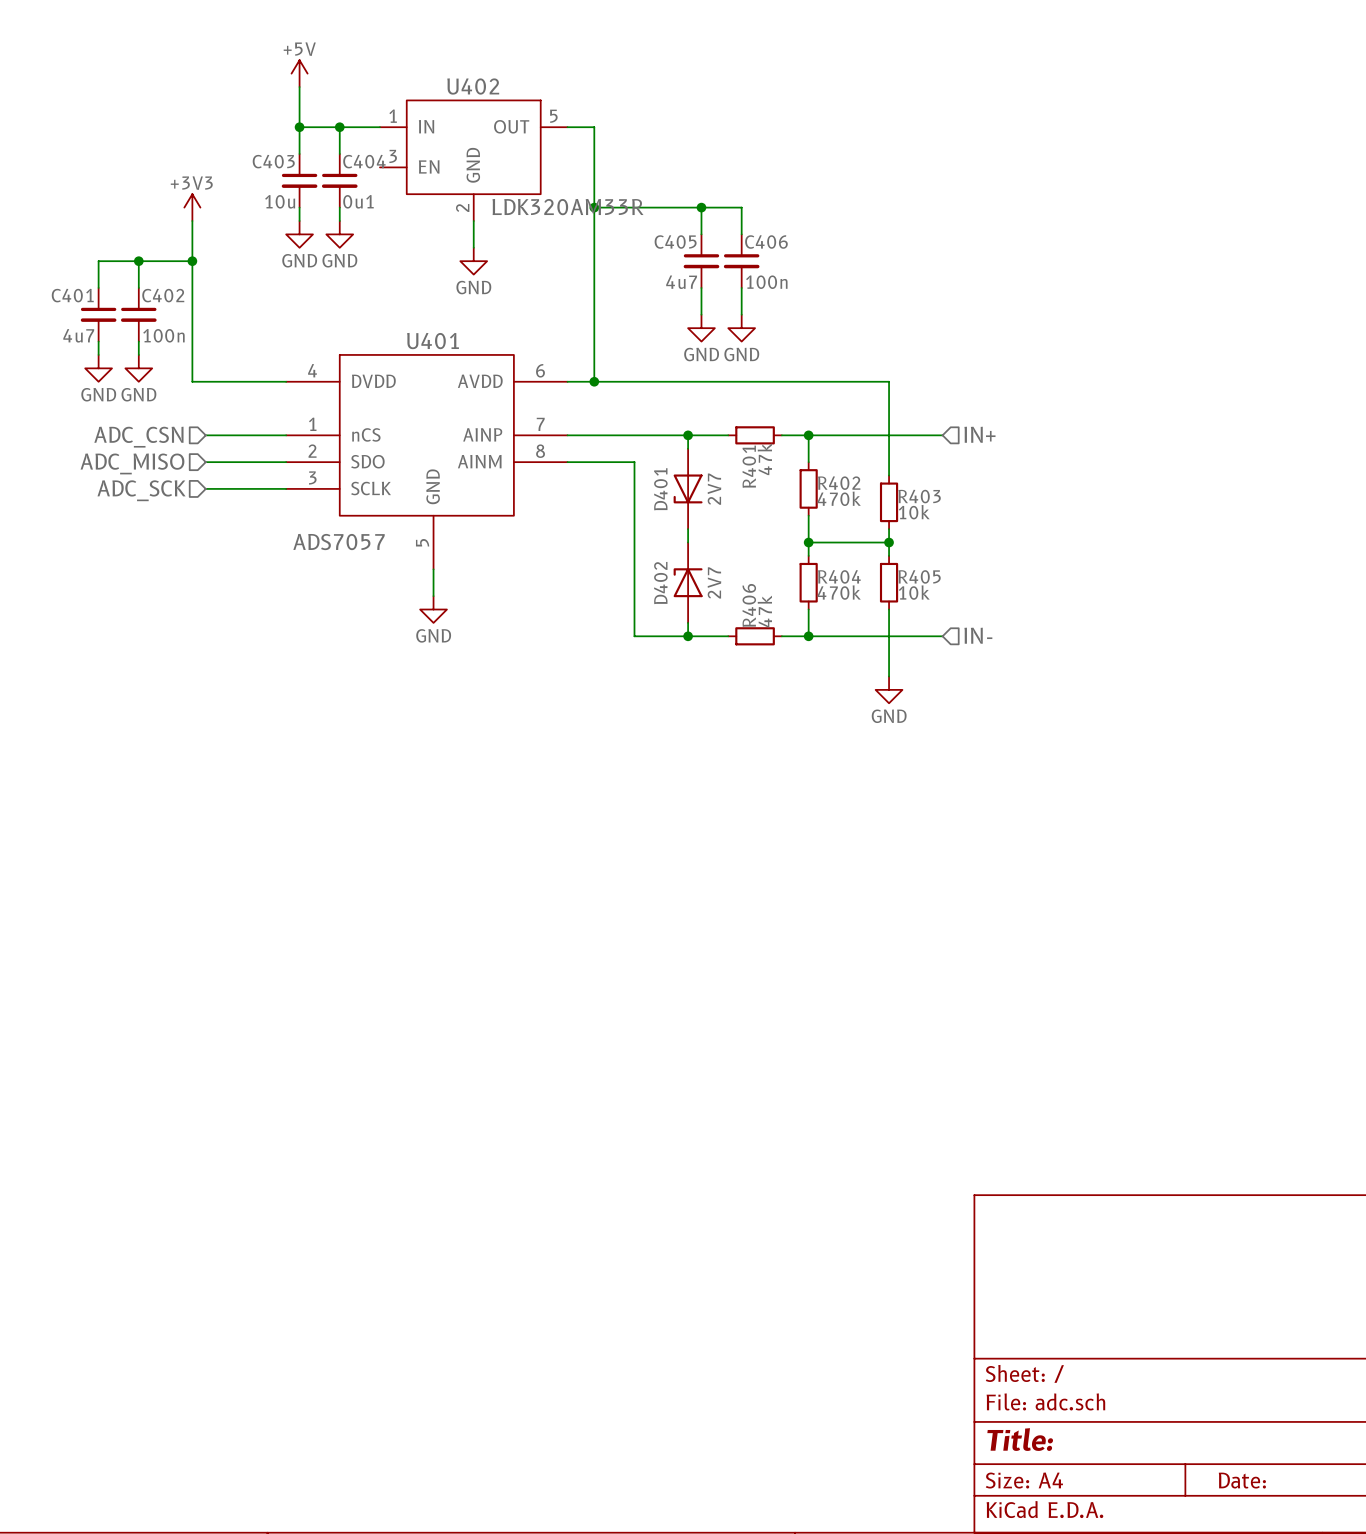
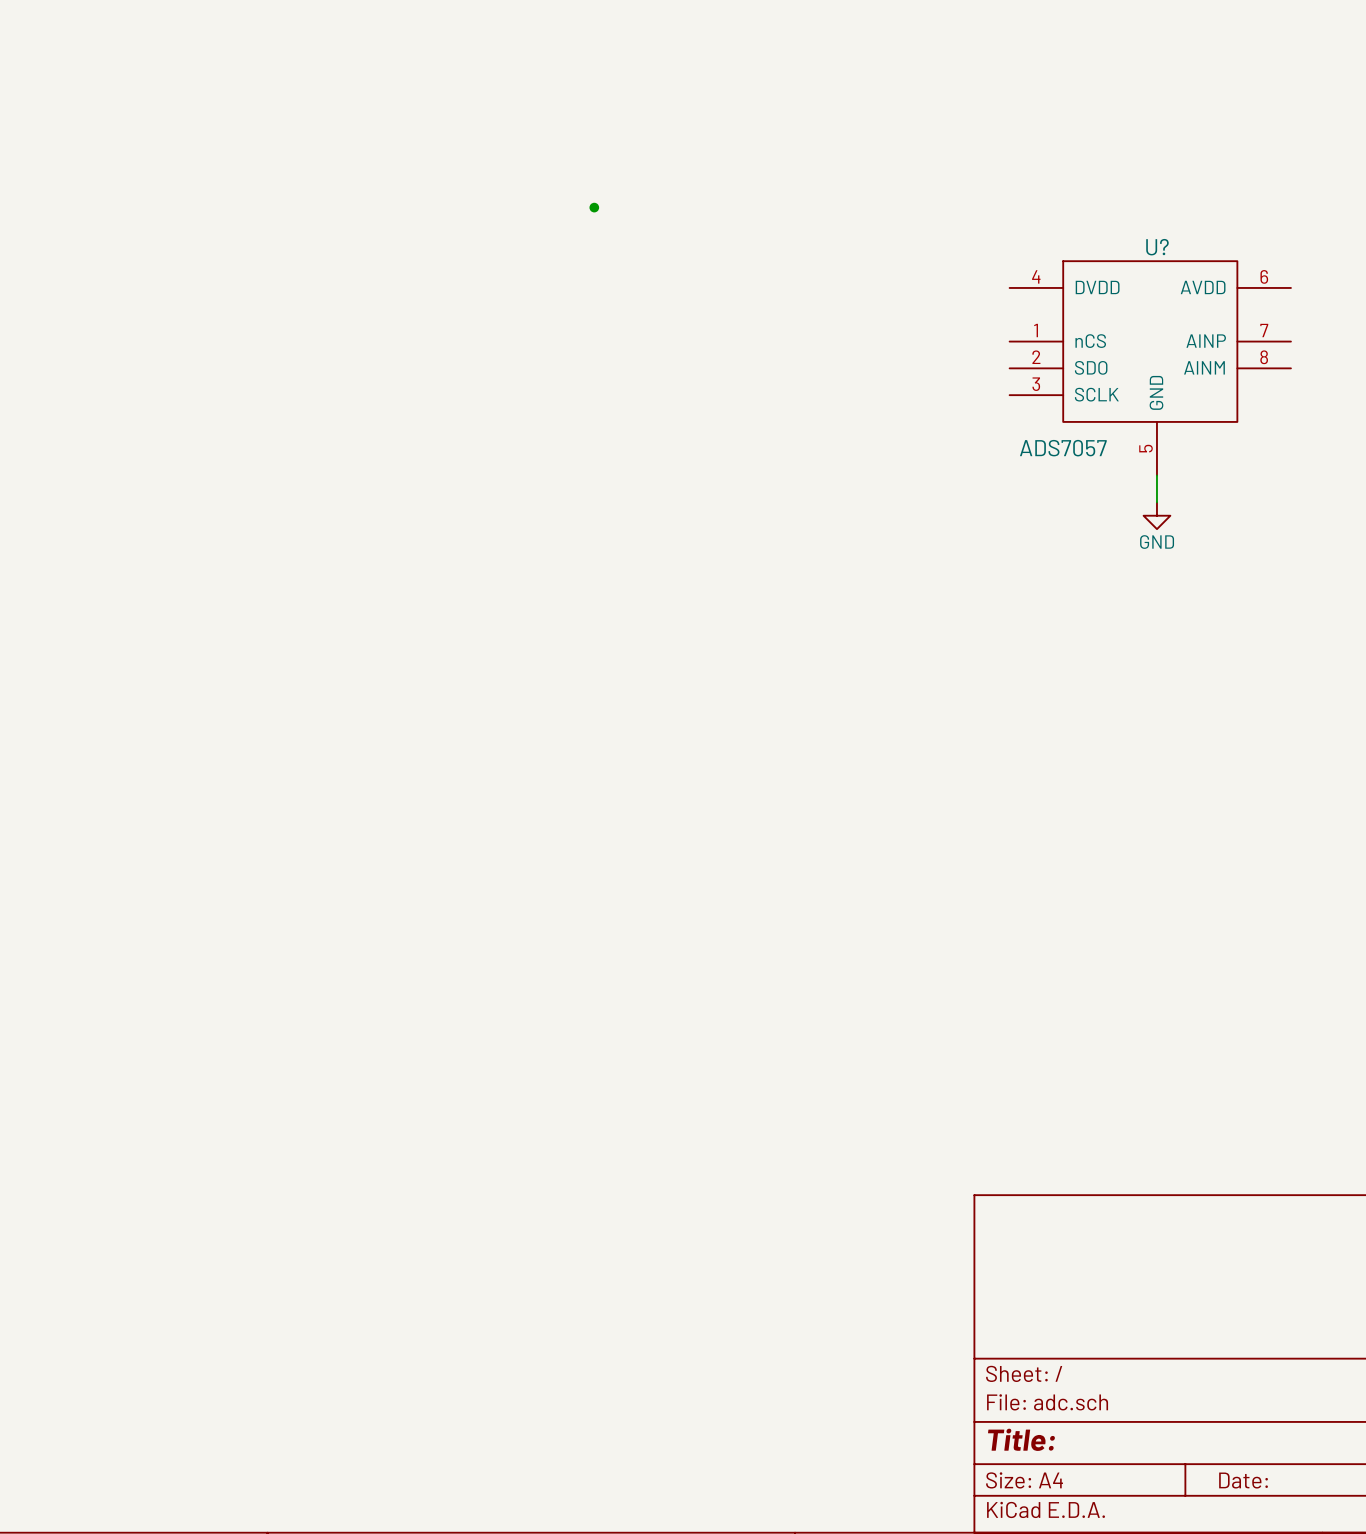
power symbol: +5V (299, 73) -> none
wire: (299, 87) (299, 154) -> none
wire: (299, 127) (379, 127) -> none
junction: (299, 127) -> none
wire: (339, 127) (339, 154) -> none
junction: (339, 127) -> none
wire: (567, 127) (594, 127) (594, 381) -> none
U402: LDK320AM33R (473, 160) -> none
C403: 10u (299, 180) -> none
C404: 0u1 (339, 180) -> none
power symbol: +3V3 (192, 207) -> none
wire: (299, 207) (299, 220) -> none
wire: (339, 207) (339, 220) -> none
wire: (594, 207) (741, 207) (741, 234) -> none
wire: (701, 207) (701, 234) -> none
junction: (701, 207) -> none
wire: (192, 220) (192, 381) (286, 381) -> none
wire: (473, 220) (473, 247) -> none
power symbol: GND (299, 234) -> none
power symbol: GND (339, 234) -> none
wire: (138, 261) (138, 287) -> none
junction: (138, 261) -> none
wire: (192, 261) (98, 261) (98, 287) -> none
junction: (192, 261) -> none
power symbol: GND (473, 261) -> none
C405: 4u7 (701, 261) -> none
C406: 100n (741, 261) -> none
wire: (701, 287) (701, 314) -> none
wire: (741, 287) (741, 314) -> none
C401: 4u7 (98, 314) -> none
C402: 100n (138, 314) -> none
power symbol: GND (701, 328) -> none
power symbol: GND (741, 328) -> none
wire: (98, 341) (98, 354) -> none
wire: (138, 341) (138, 354) -> none
power symbol: GND (98, 368) -> none
power symbol: GND (138, 368) -> none
U?: none -> ADS7057 (1150, 368)
wire: (567, 381) (889, 381) (889, 475) -> none
junction: (594, 381) -> none
hierarchical label: IN+ (979, 434) -> none
wire: (205, 435) (286, 435) -> none
wire: (567, 435) (728, 435) -> none
wire: (688, 435) (688, 448) -> none
junction: (688, 435) -> none
R401: 47k (755, 435) -> none
wire: (781, 435) (942, 435) -> none
wire: (808, 435) (808, 462) -> none
junction: (808, 435) -> none
hierarchical label: ADC_CSN (138, 437) -> none
wire: (205, 462) (286, 462) -> none
U401: ADS7057 (426, 462) -> none
wire: (567, 462) (634, 462) (634, 636) (728, 636) -> none
hierarchical label: ADC_MISO (132, 463) -> none
wire: none -> (1156, 475) (1156, 502)
wire: (205, 488) (286, 488) -> none
D401: 2V7 (688, 488) -> none
R402: 470k (808, 488) -> none
hierarchical label: ADC_SCK (141, 490) -> none
R403: 10k (889, 502) -> none
wire: (808, 515) (808, 555) -> none
power symbol: none -> GND (1156, 515)
wire: (688, 529) (688, 542) -> none
wire: (889, 529) (889, 555) -> none
wire: (808, 542) (889, 542) -> none
junction: (808, 542) -> none
junction: (889, 542) -> none
wire: (433, 569) (433, 596) -> none
D402: 2V7 (688, 582) -> none
R404: 470k (808, 582) -> none
R405: 10k (889, 582) -> none
power symbol: GND (433, 609) -> none
wire: (808, 609) (808, 636) -> none
wire: (889, 609) (889, 676) -> none
wire: (688, 622) (688, 636) -> none
hierarchical label: IN- (978, 635) -> none
junction: (688, 636) -> none
R406: 47k (755, 636) -> none
wire: (781, 636) (942, 636) -> none
junction: (808, 636) -> none
power symbol: GND (889, 689) -> none

